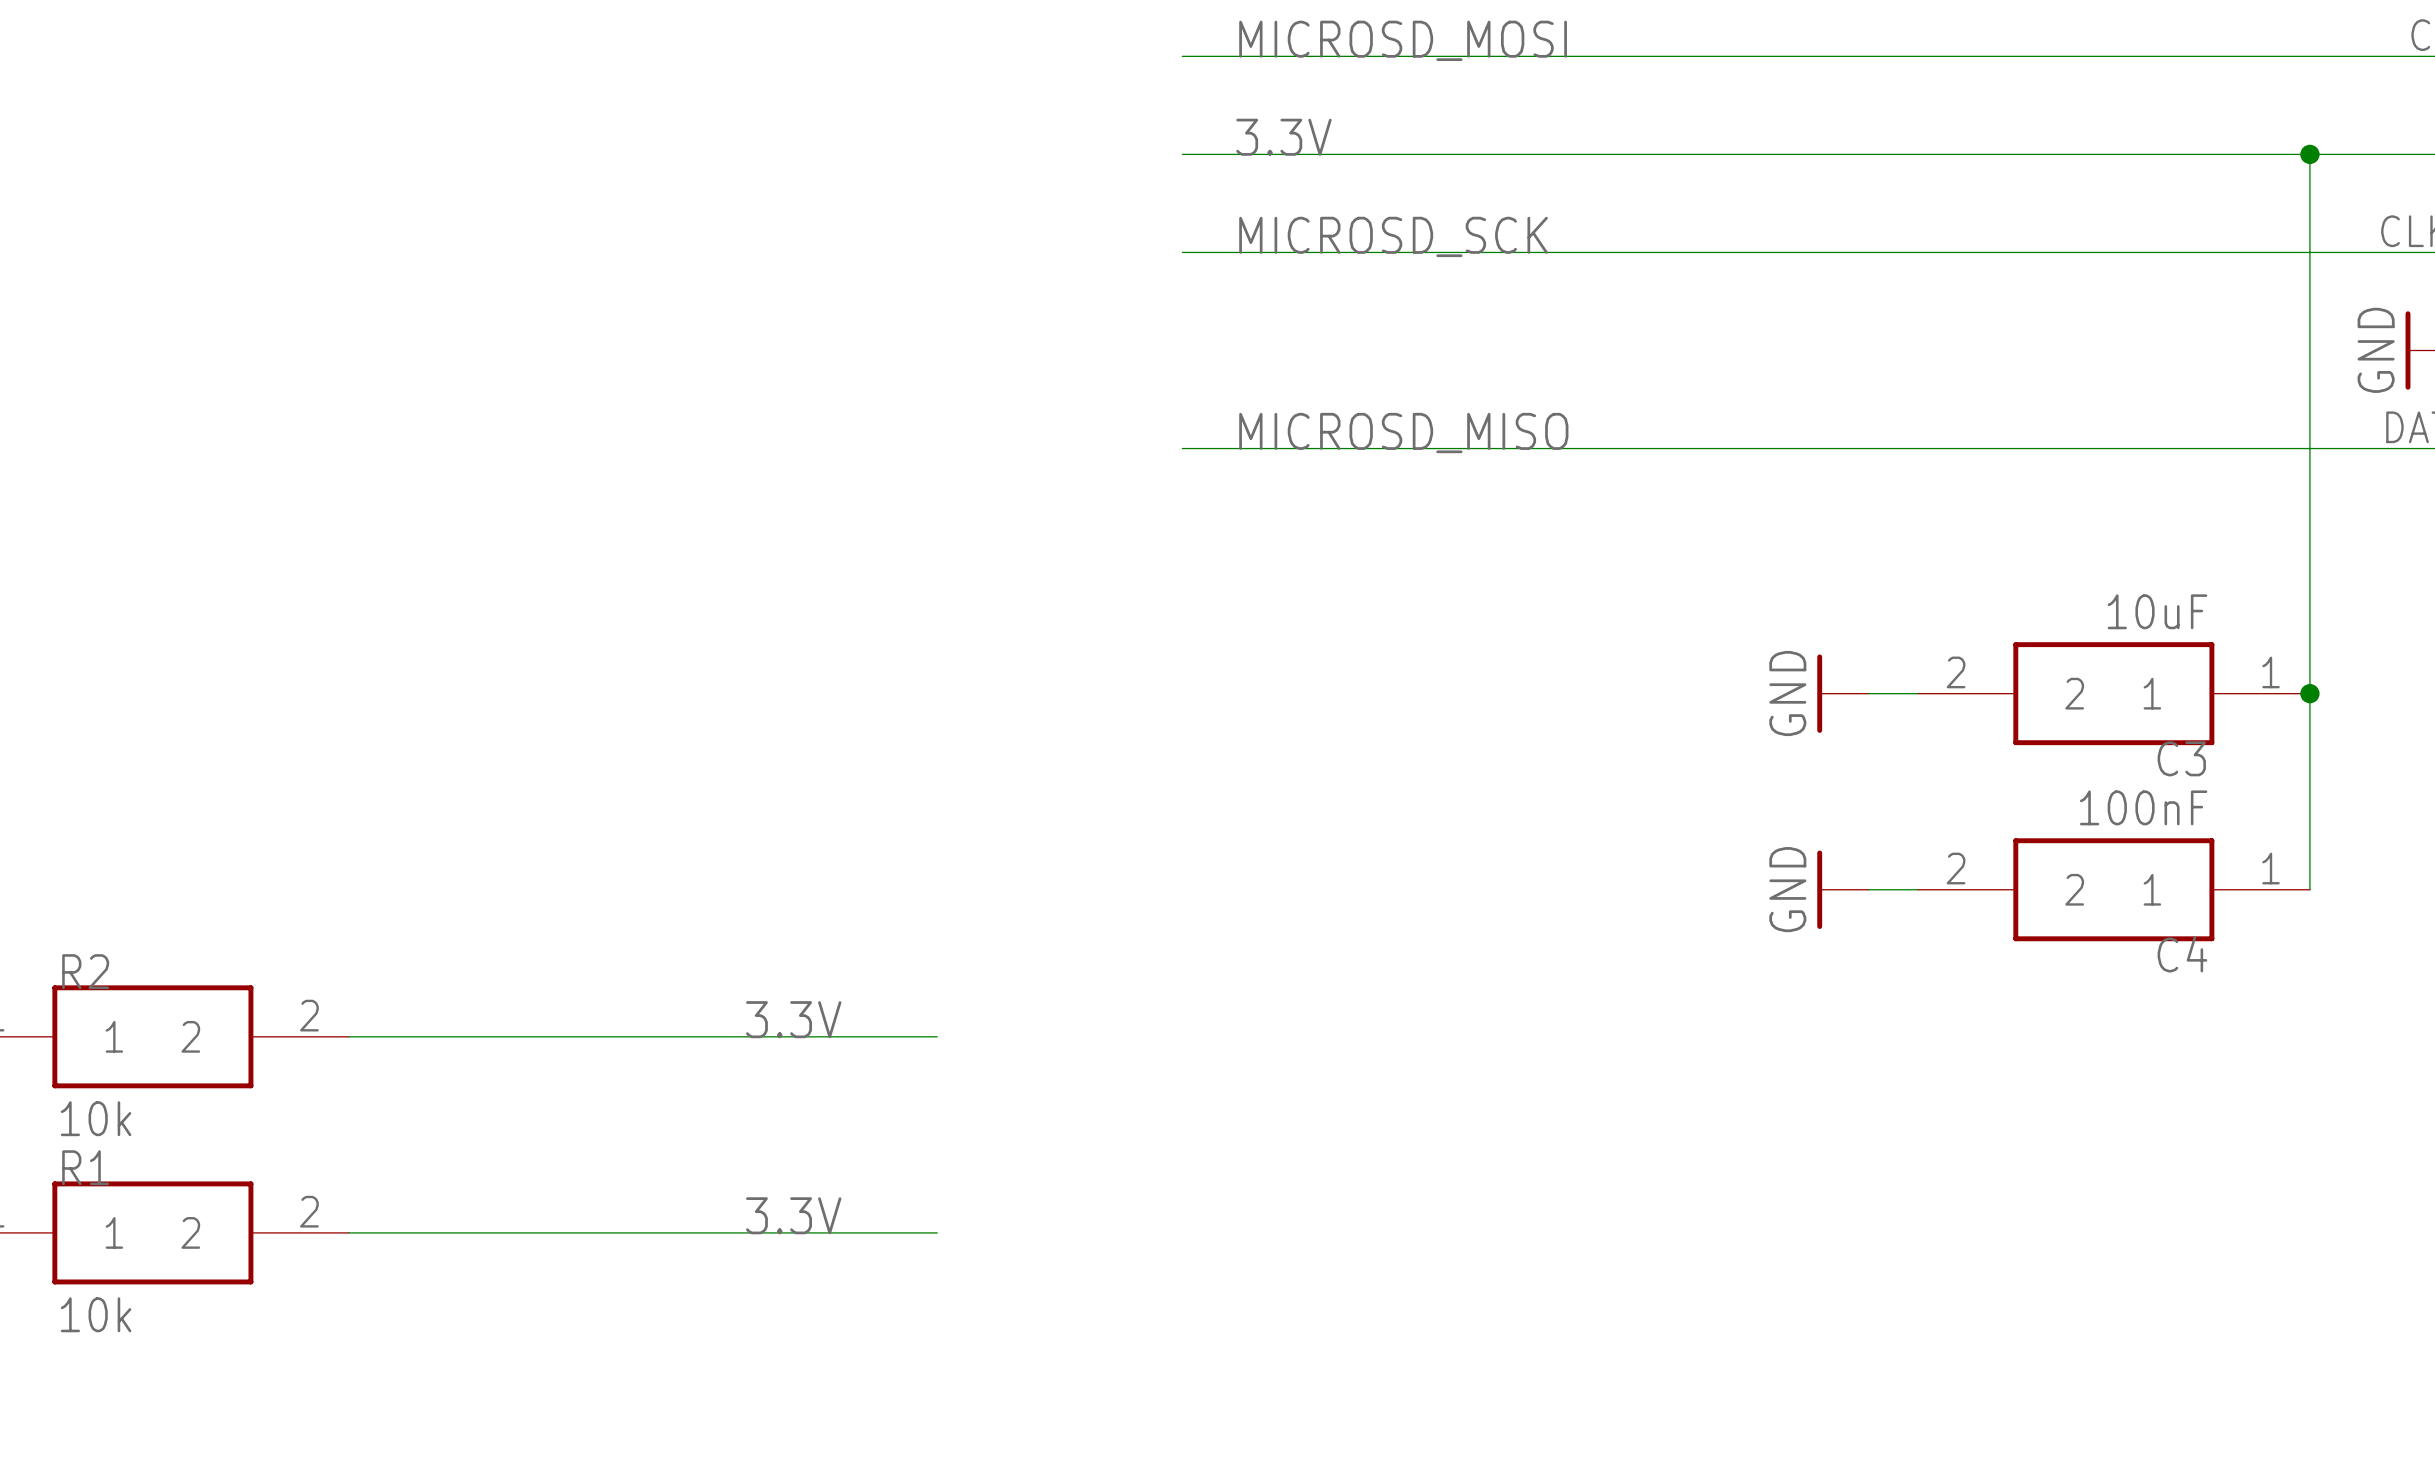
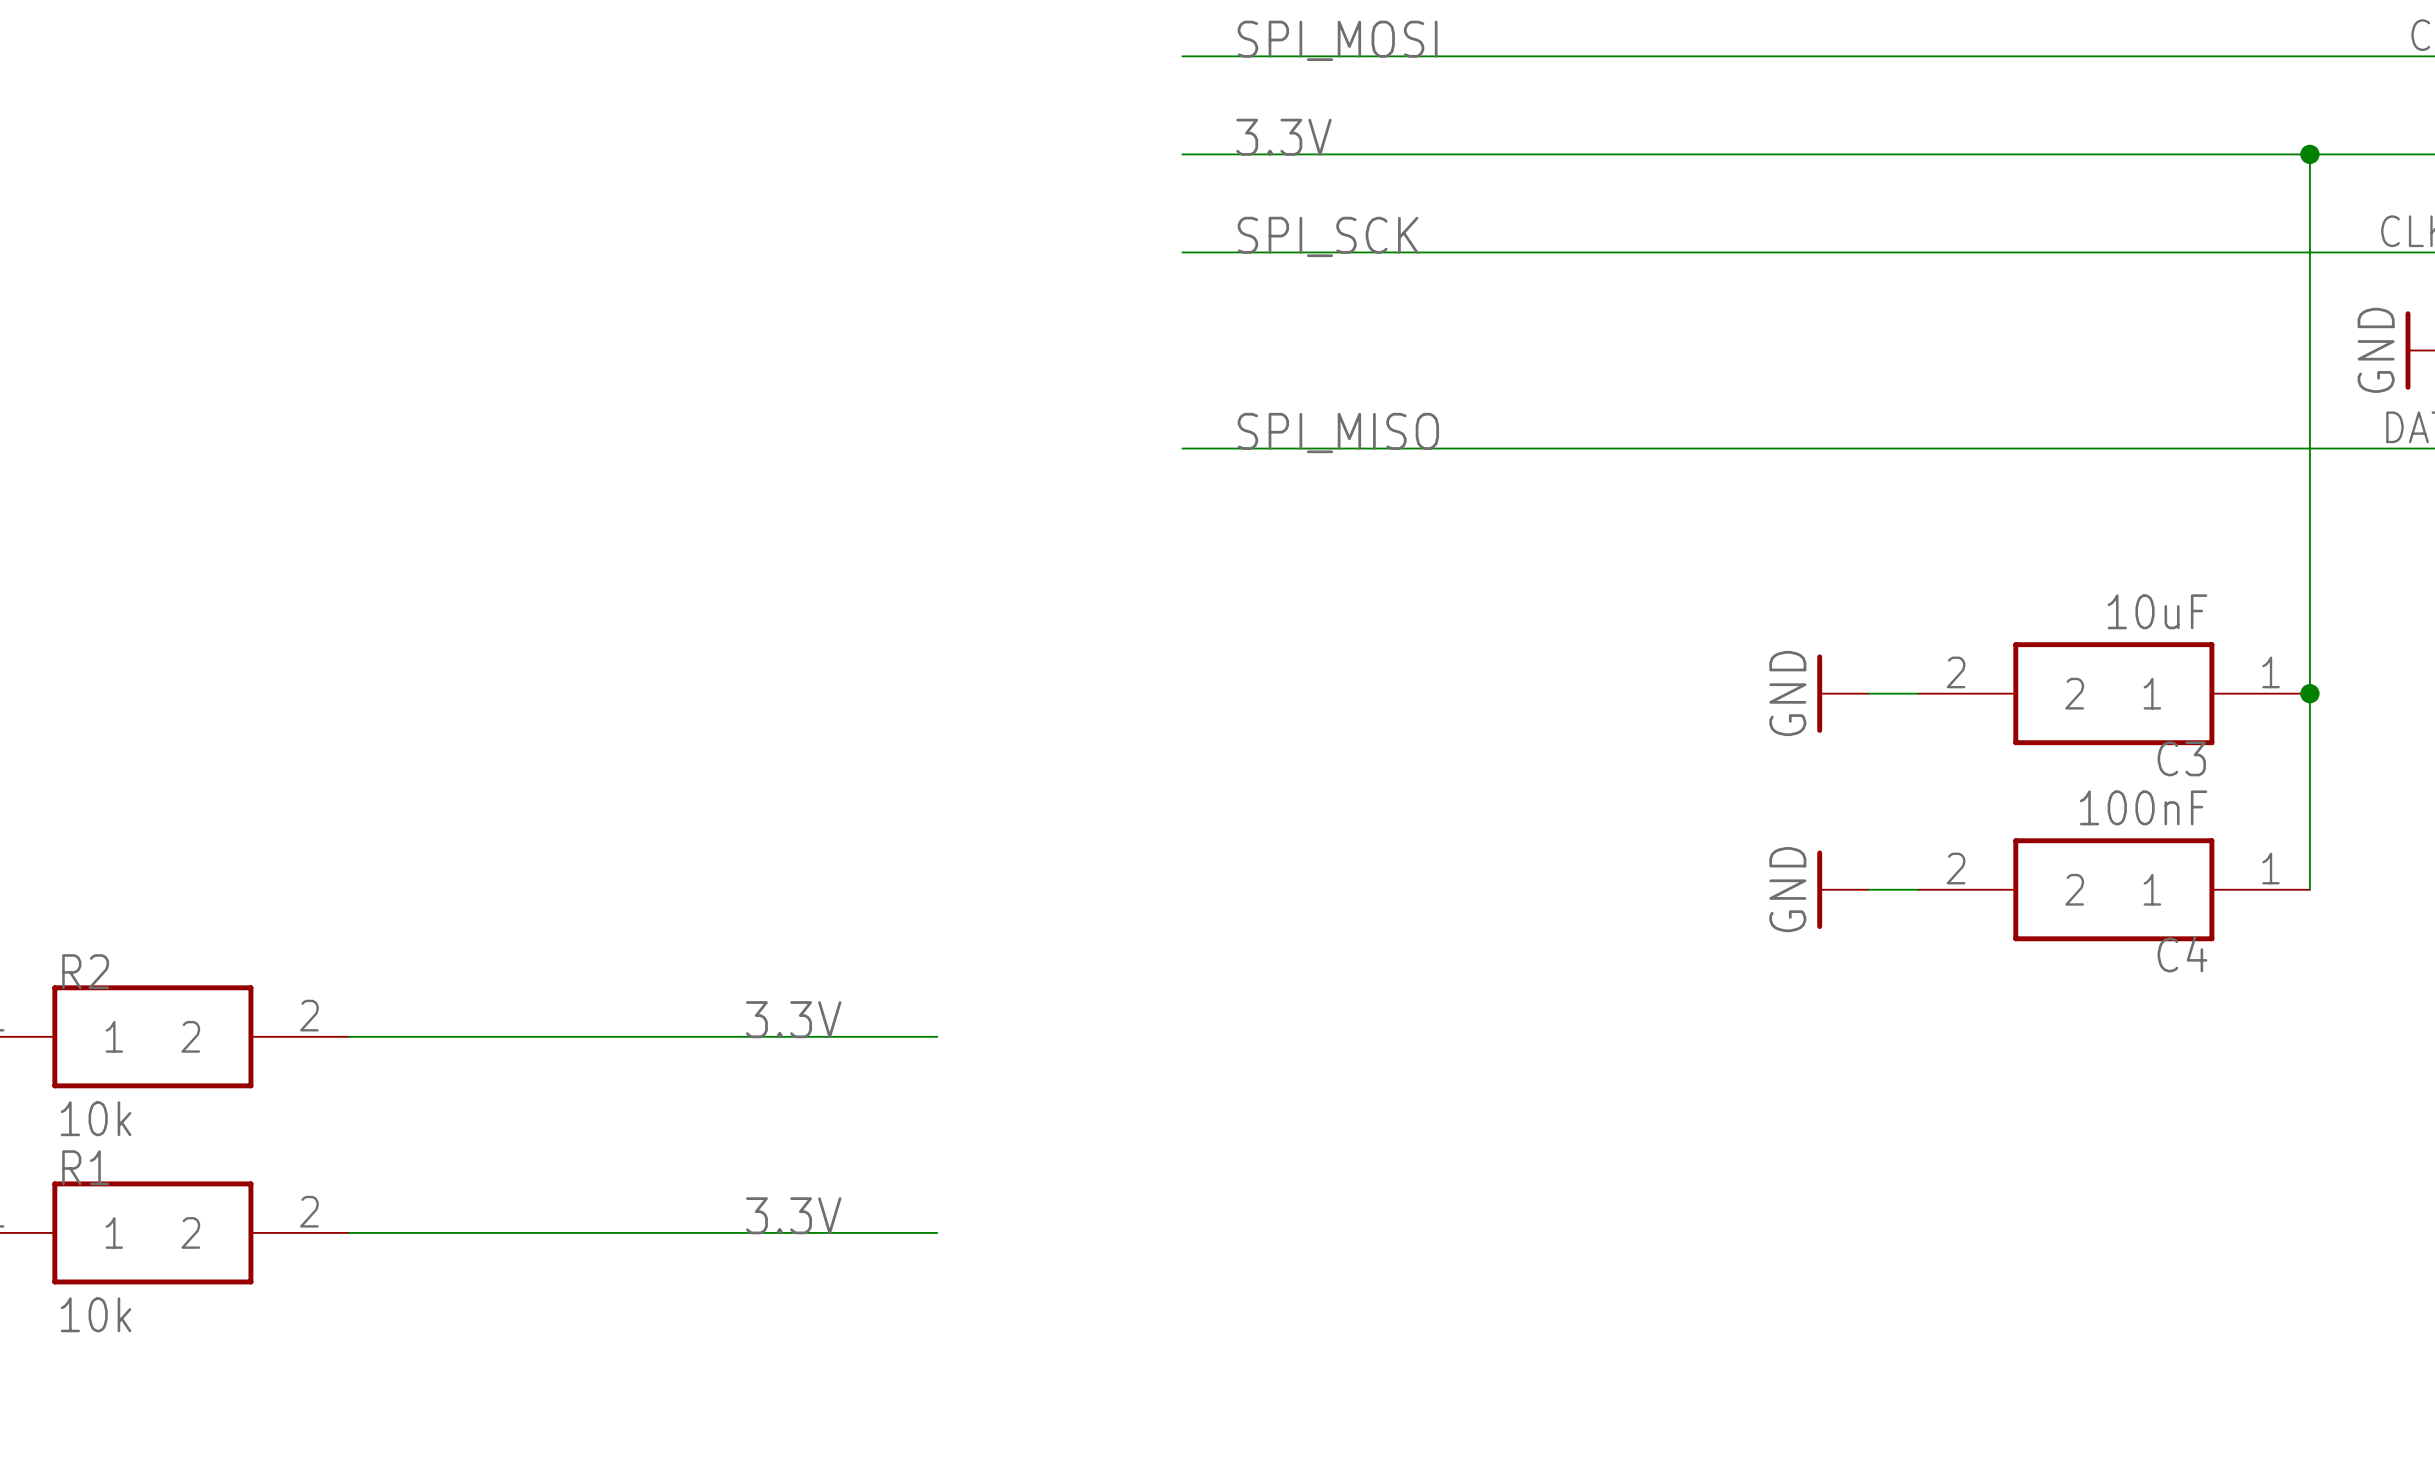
label: MICROSD_MOSI (1403, 40) -> SPI_MOSI (1337, 40)
label: MICROSD_SCK (1393, 236) -> SPI_SCK (1328, 236)
label: MICROSD_MISO (1403, 433) -> SPI_MISO (1338, 433)

